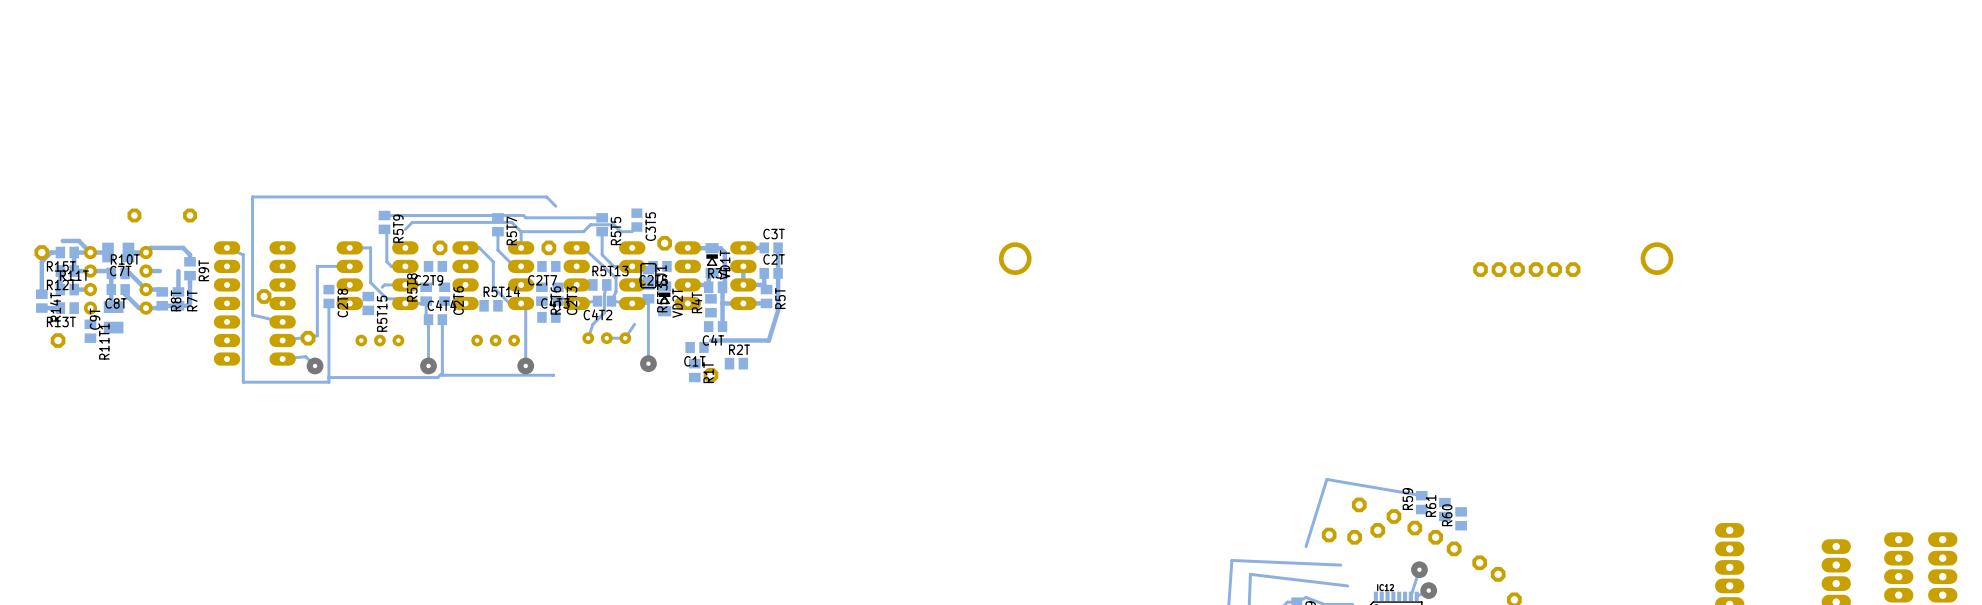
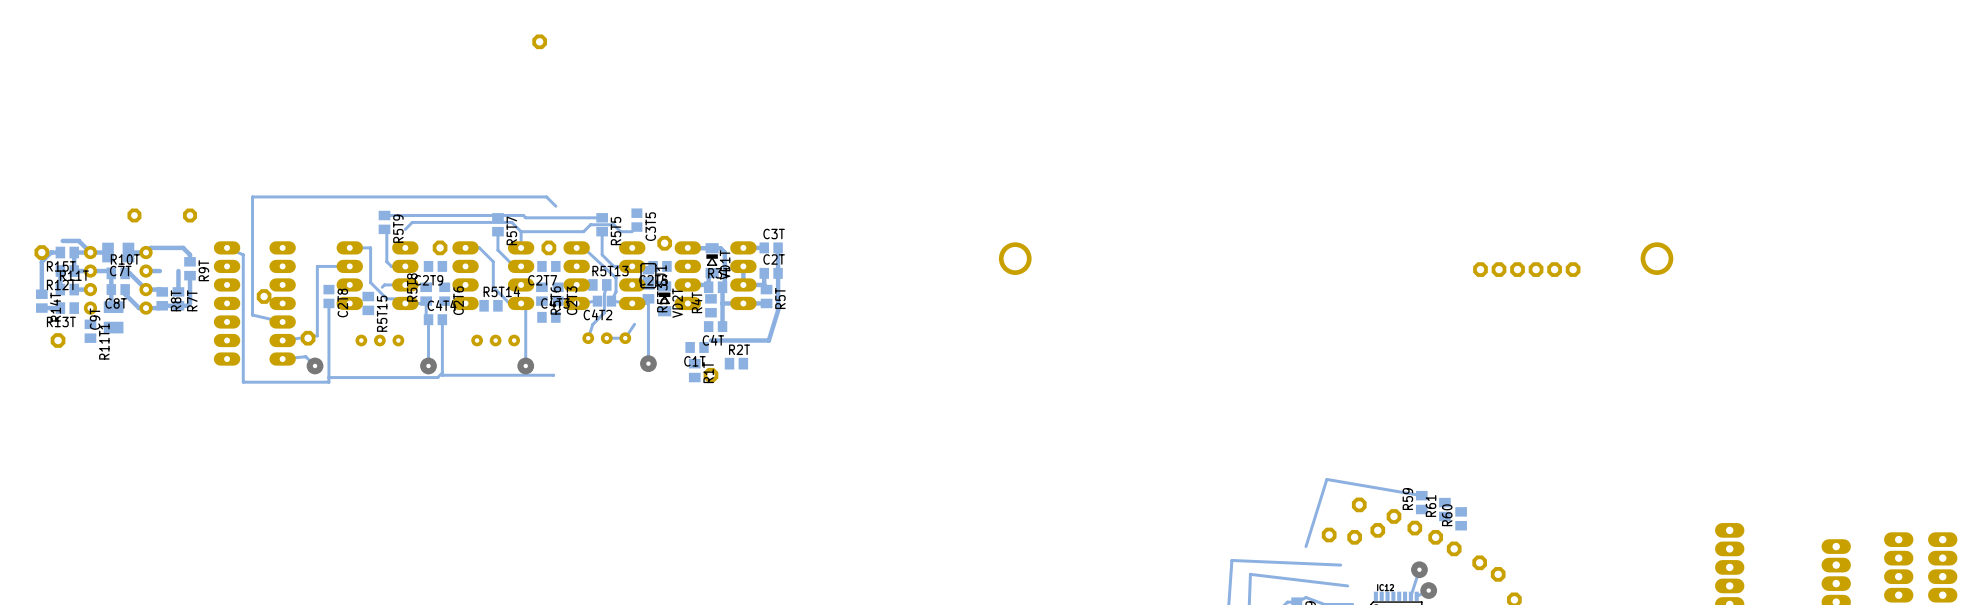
part: none -> (539, 41)

